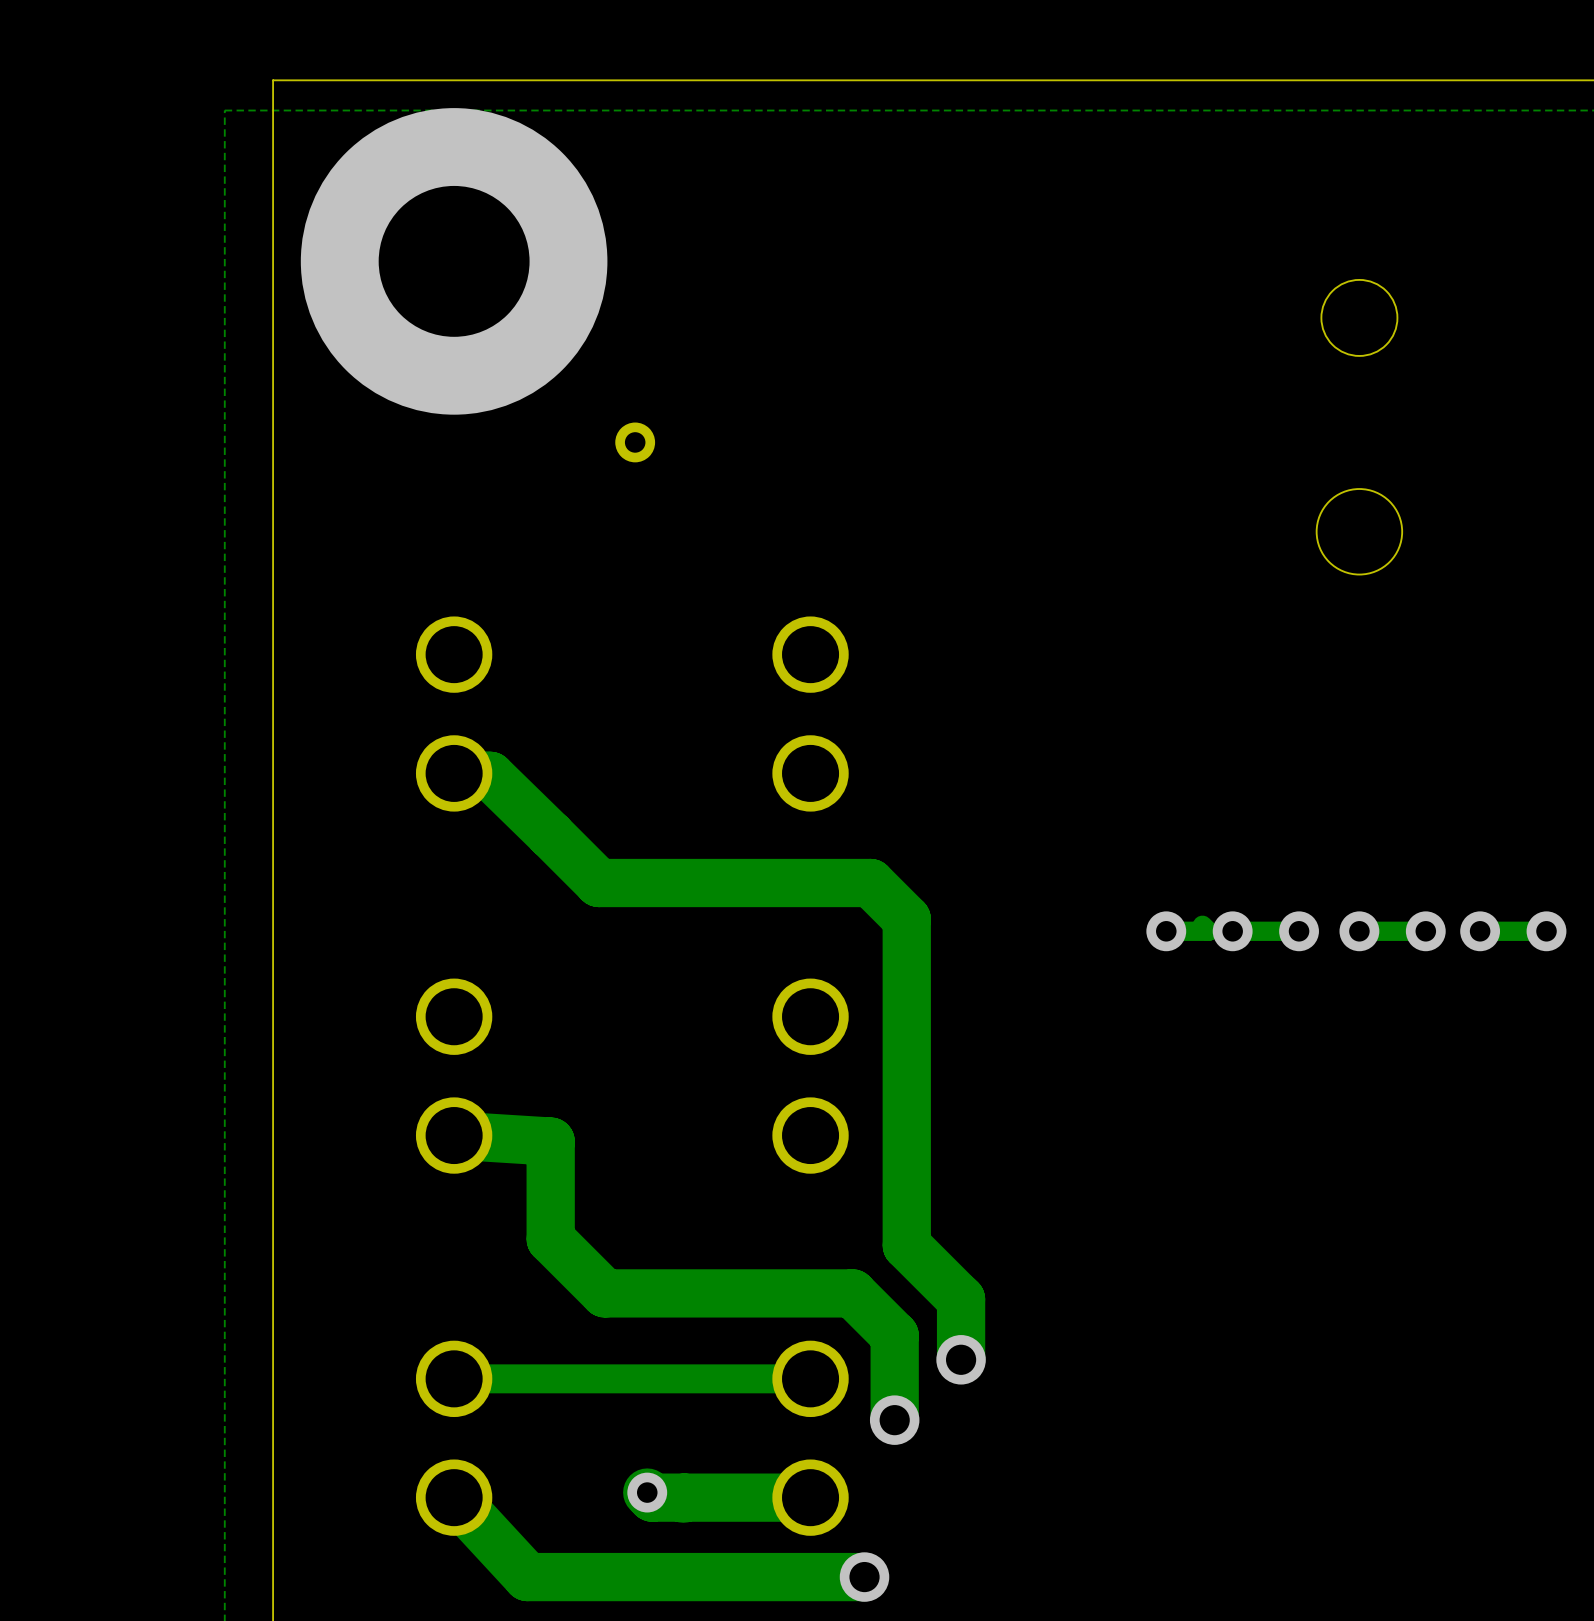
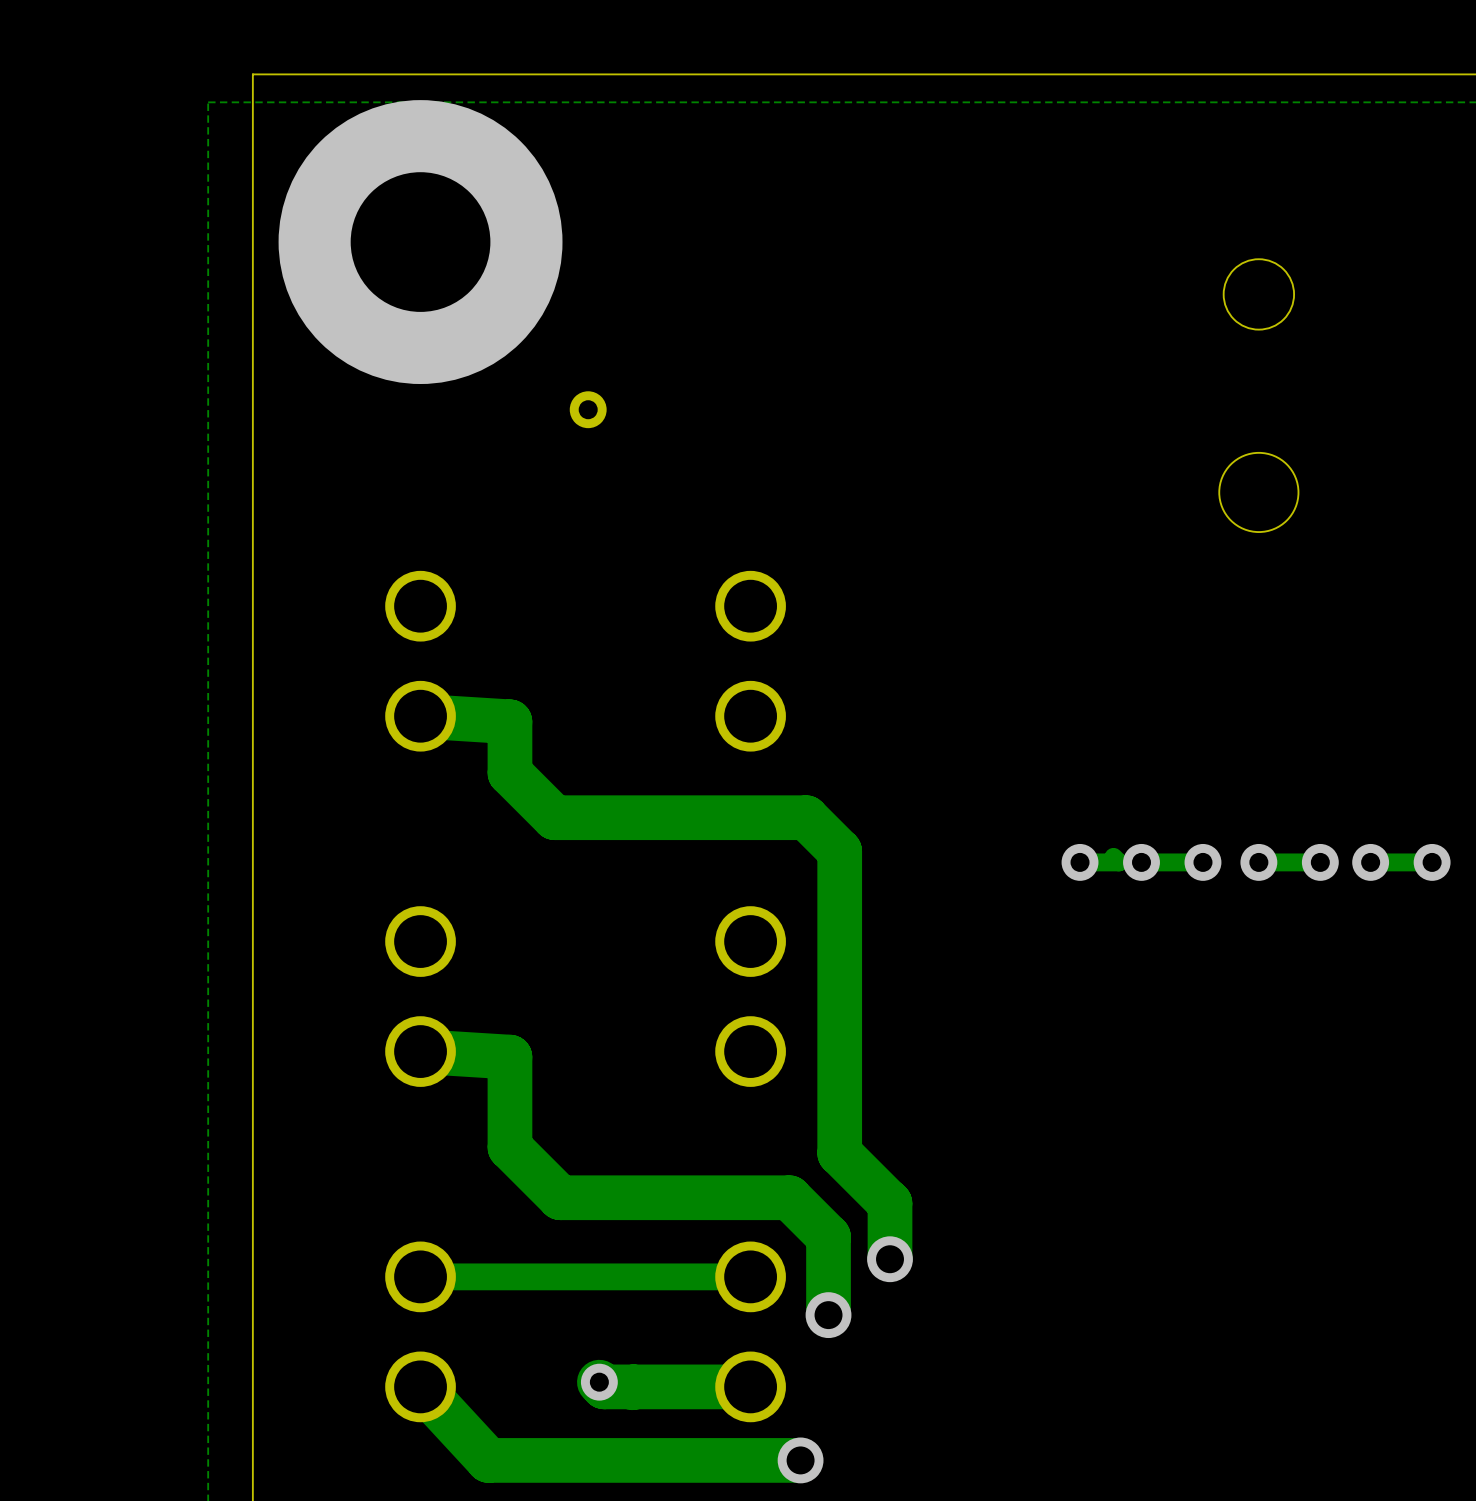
track: (454, 773) (490, 775) (550, 834) -> (420, 716) (509, 721) (509, 772)

